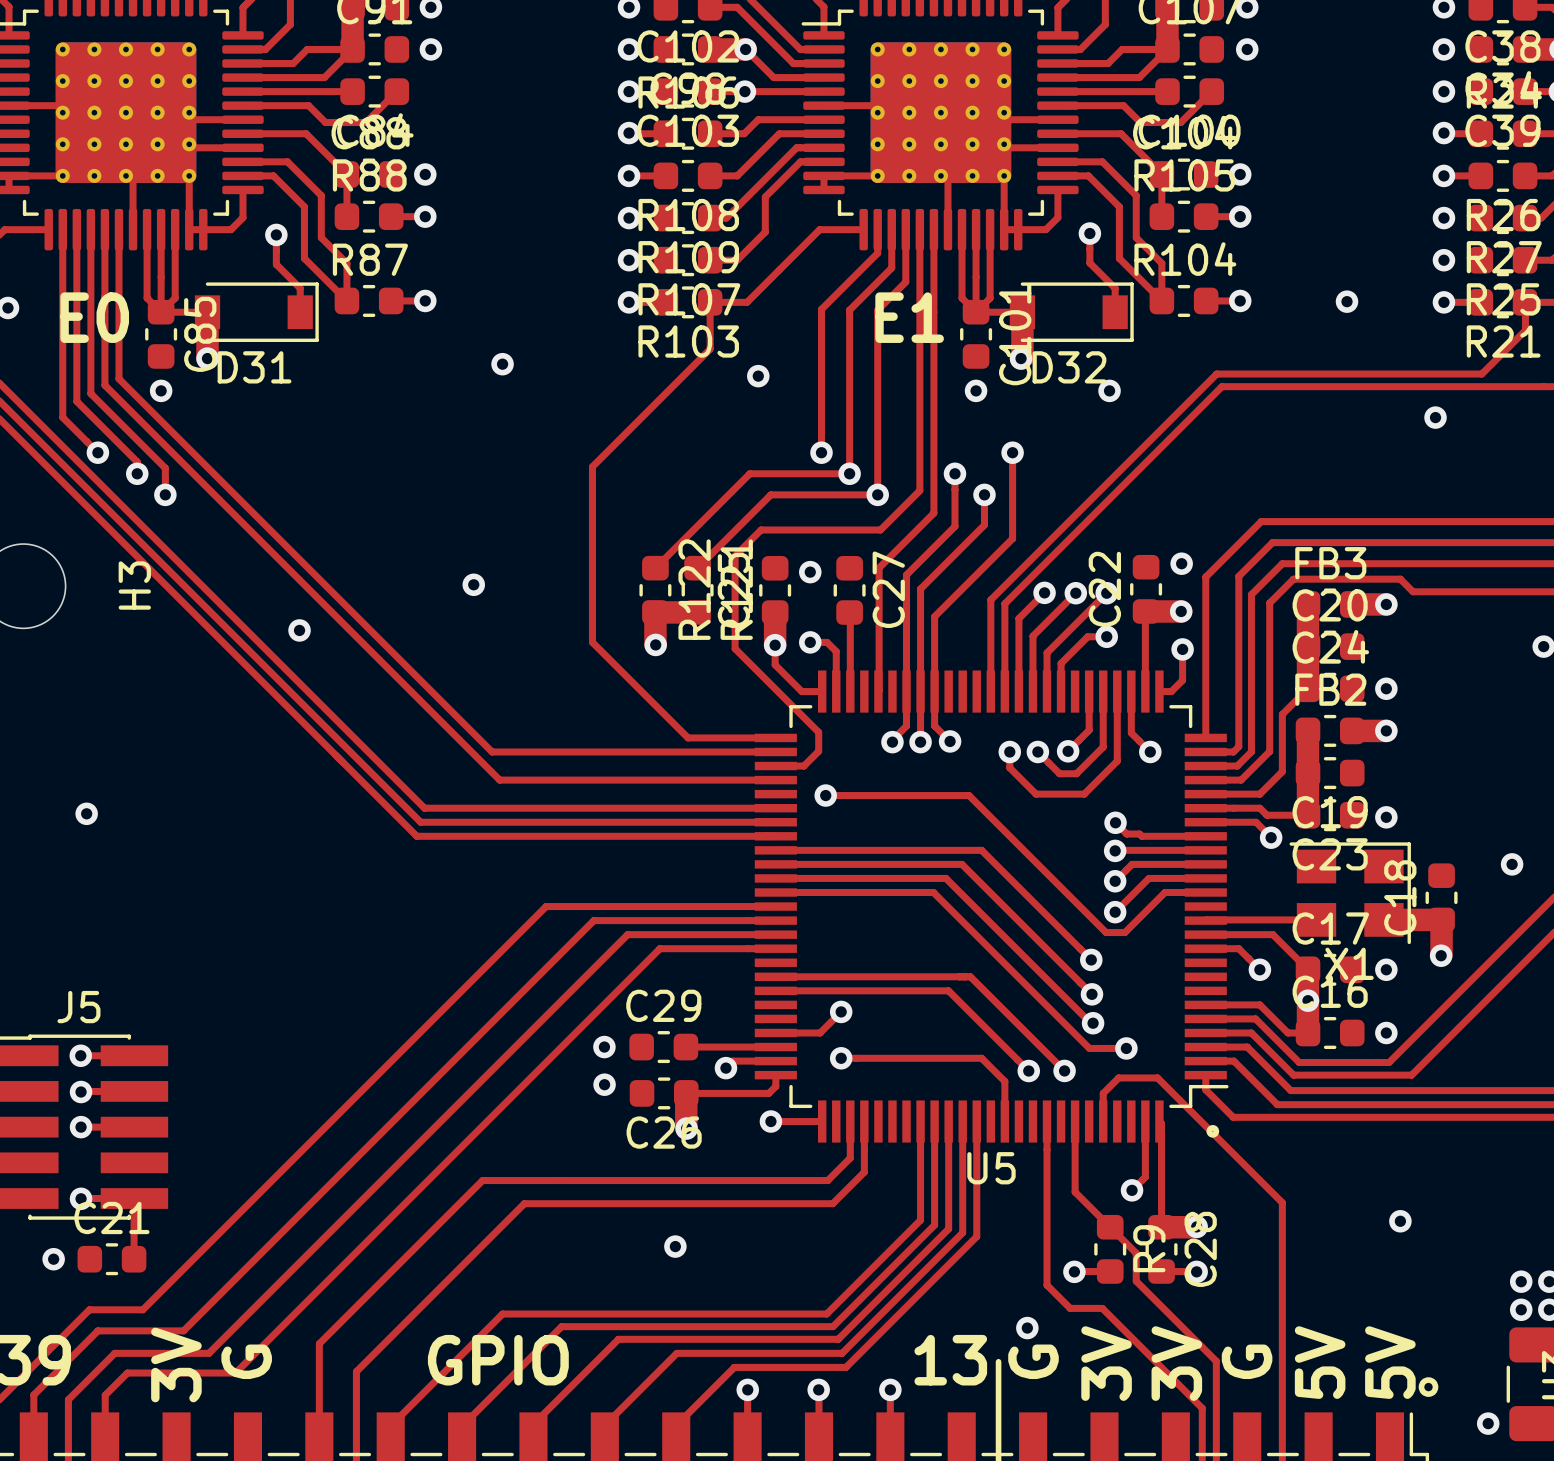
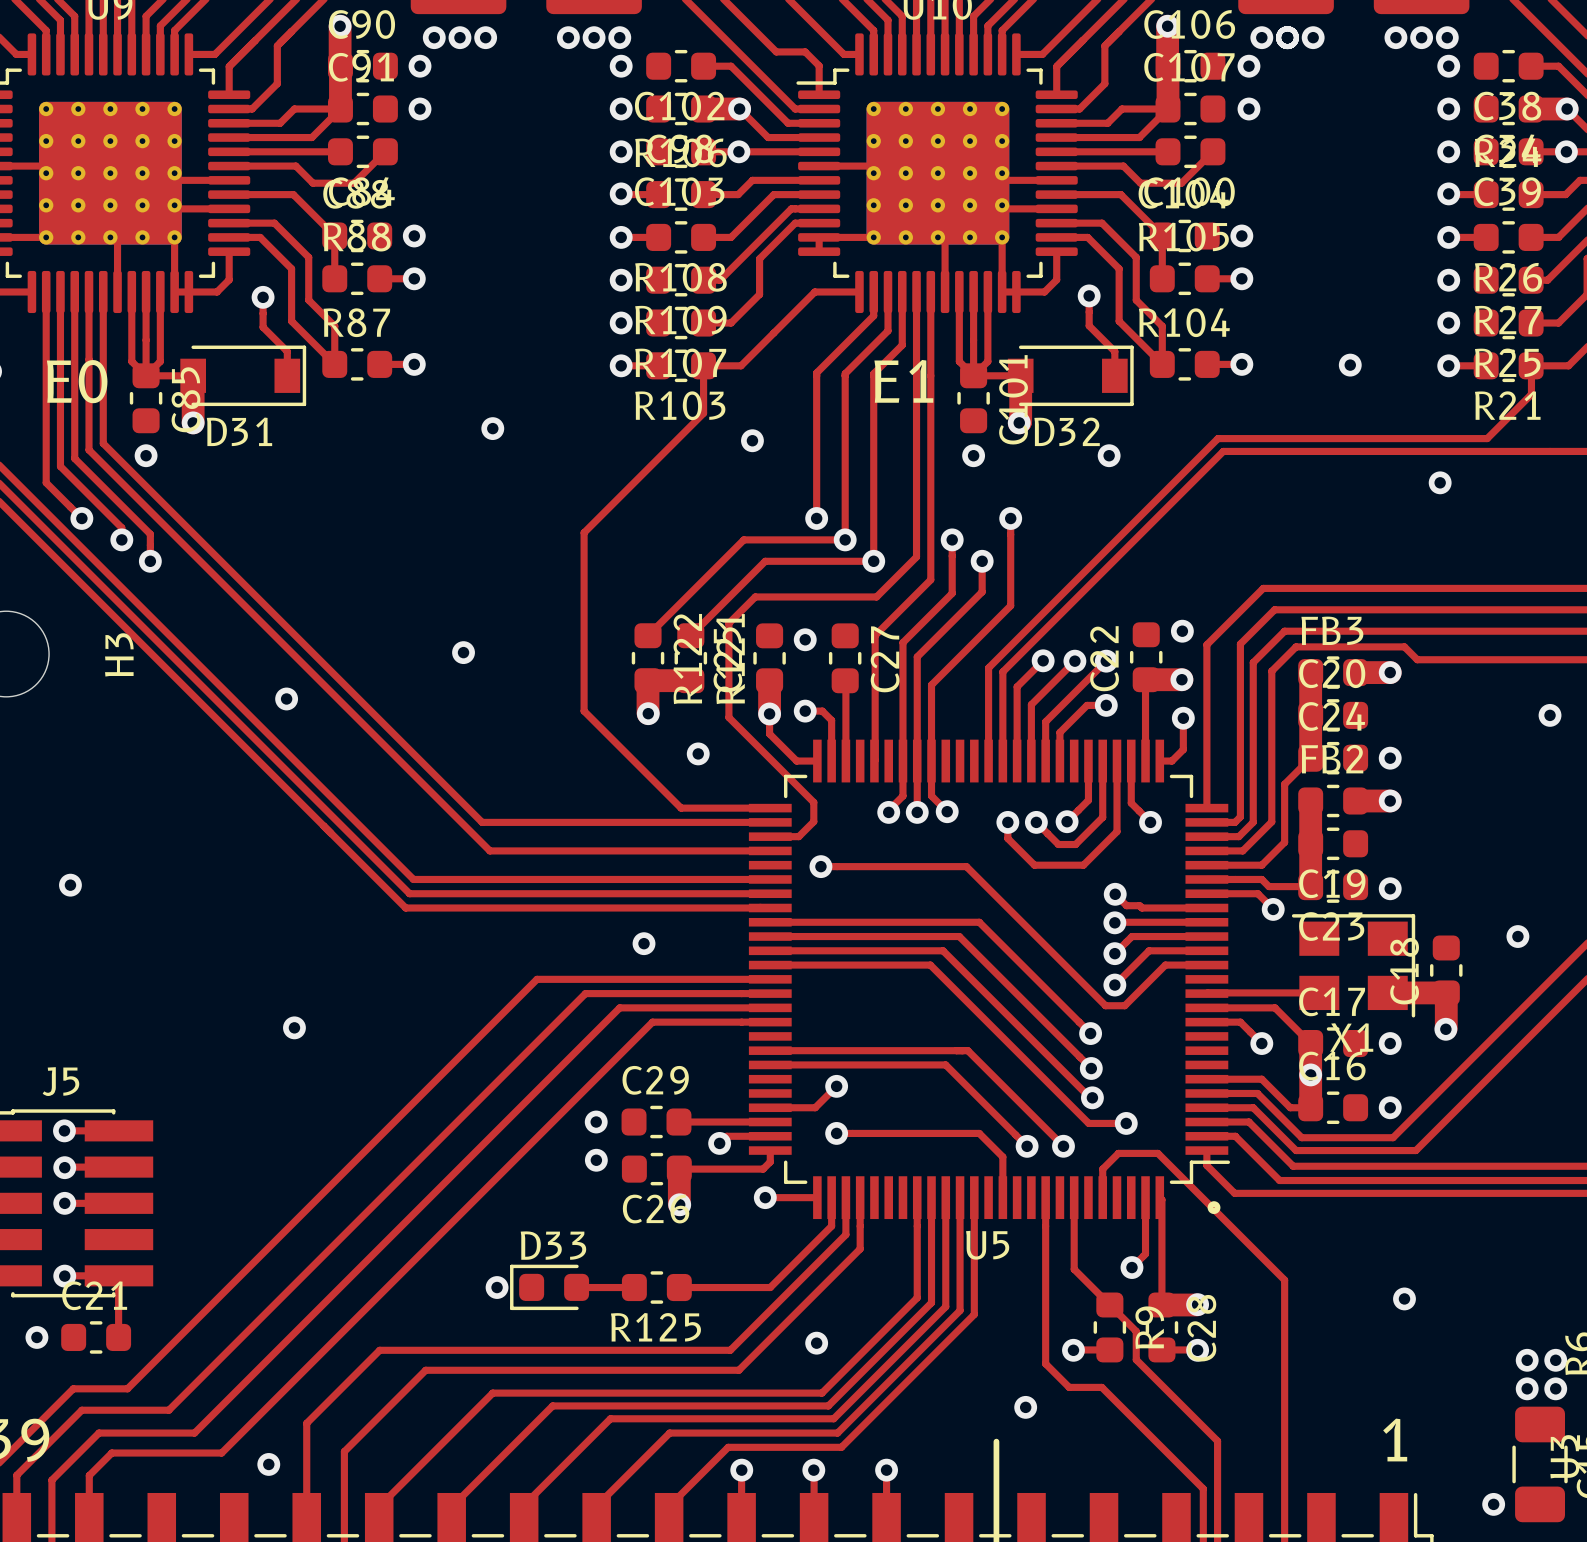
via: none -> (698, 753)
via: none -> (644, 943)
via: none -> (294, 1027)
top track: none -> (831, 1197) (831, 1226) (770, 1287) (679, 1287)
top track: (827, 1180) (482, 1180) (391, 1271) -> (823, 1257) (730, 1350) (379, 1350)
top track: (832, 1203) (524, 1203) (436, 1291) -> (828, 1281) (738, 1370) (425, 1370)
D33: none -> (549, 1287)
via: none -> (497, 1287)
top track: none -> (576, 1287) (634, 1287)
R125: none -> (656, 1287)
via: (675, 1246) -> none
via: none -> (816, 1343)
text: GPIO (498, 1360) -> none
text: 13 (950, 1360) -> none
text: G (246, 1361) -> none
text: G (1033, 1361) -> none
text: G (1247, 1361) -> none
text: 5V (1320, 1362) -> none
text: 5V (1390, 1362) -> 1 (1395, 1440)
text: 3V (1106, 1363) -> none
text: 3V (1176, 1363) -> none
text: 3V (176, 1364) -> none
drawing: [1418, 1377, 1439, 1397] -> none
via: none -> (268, 1464)

